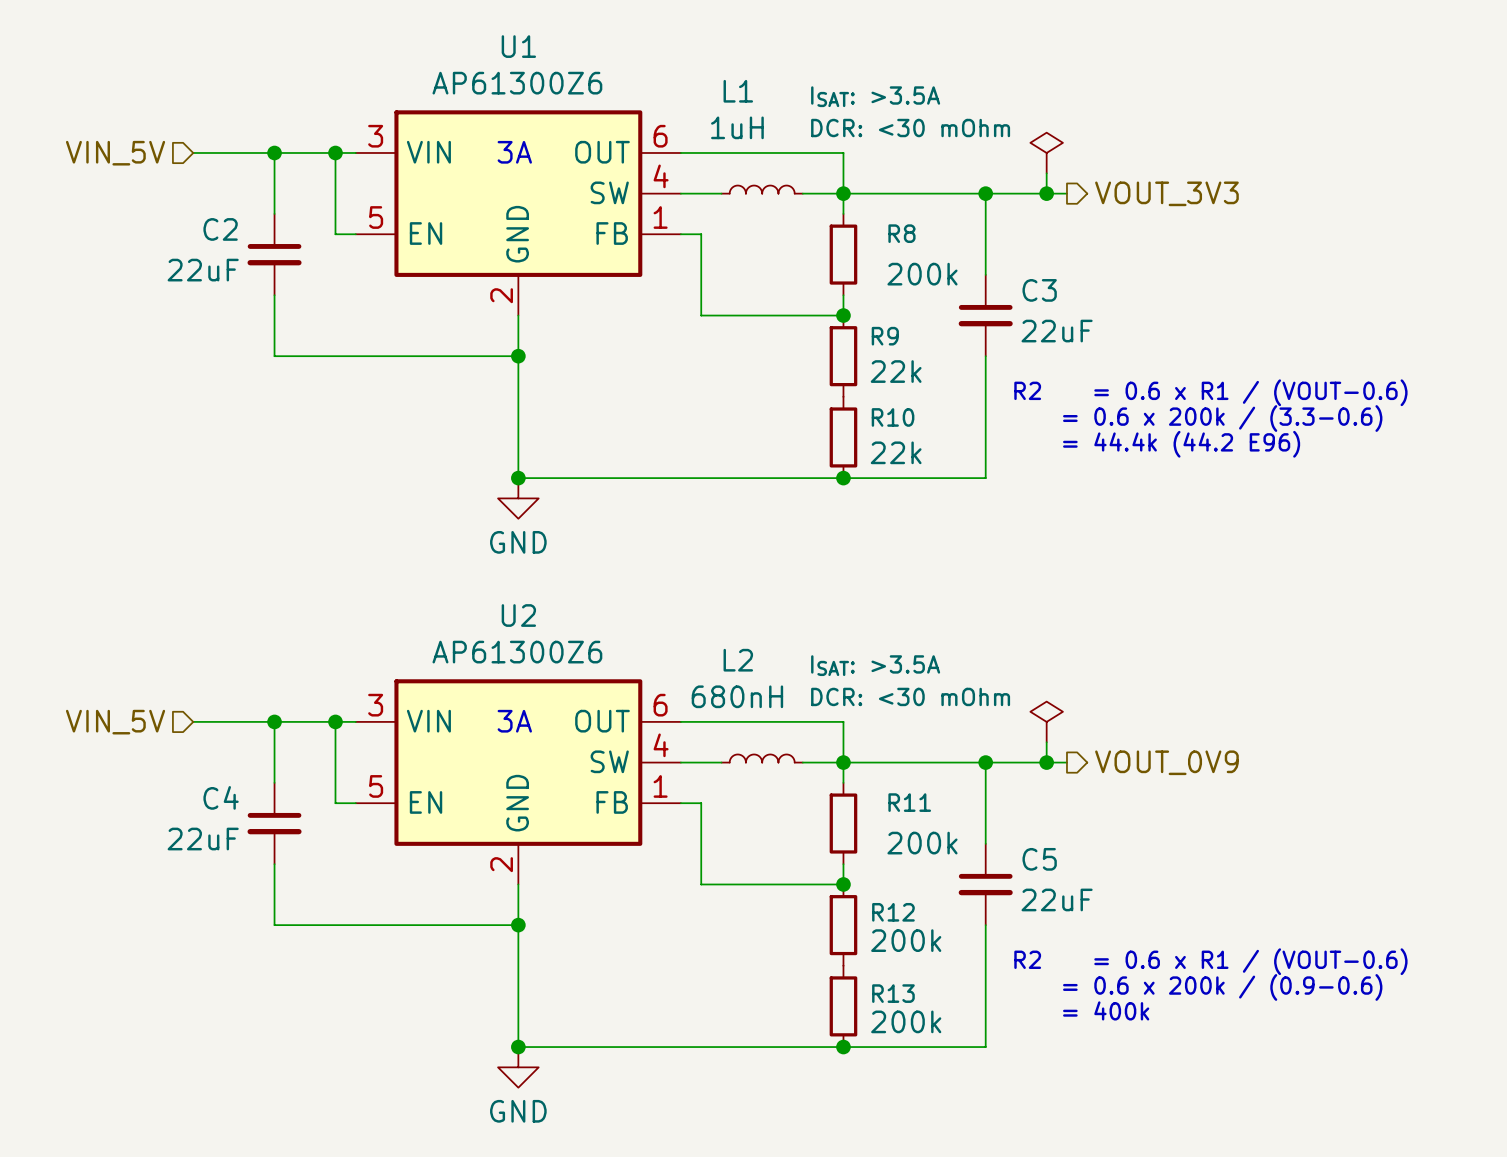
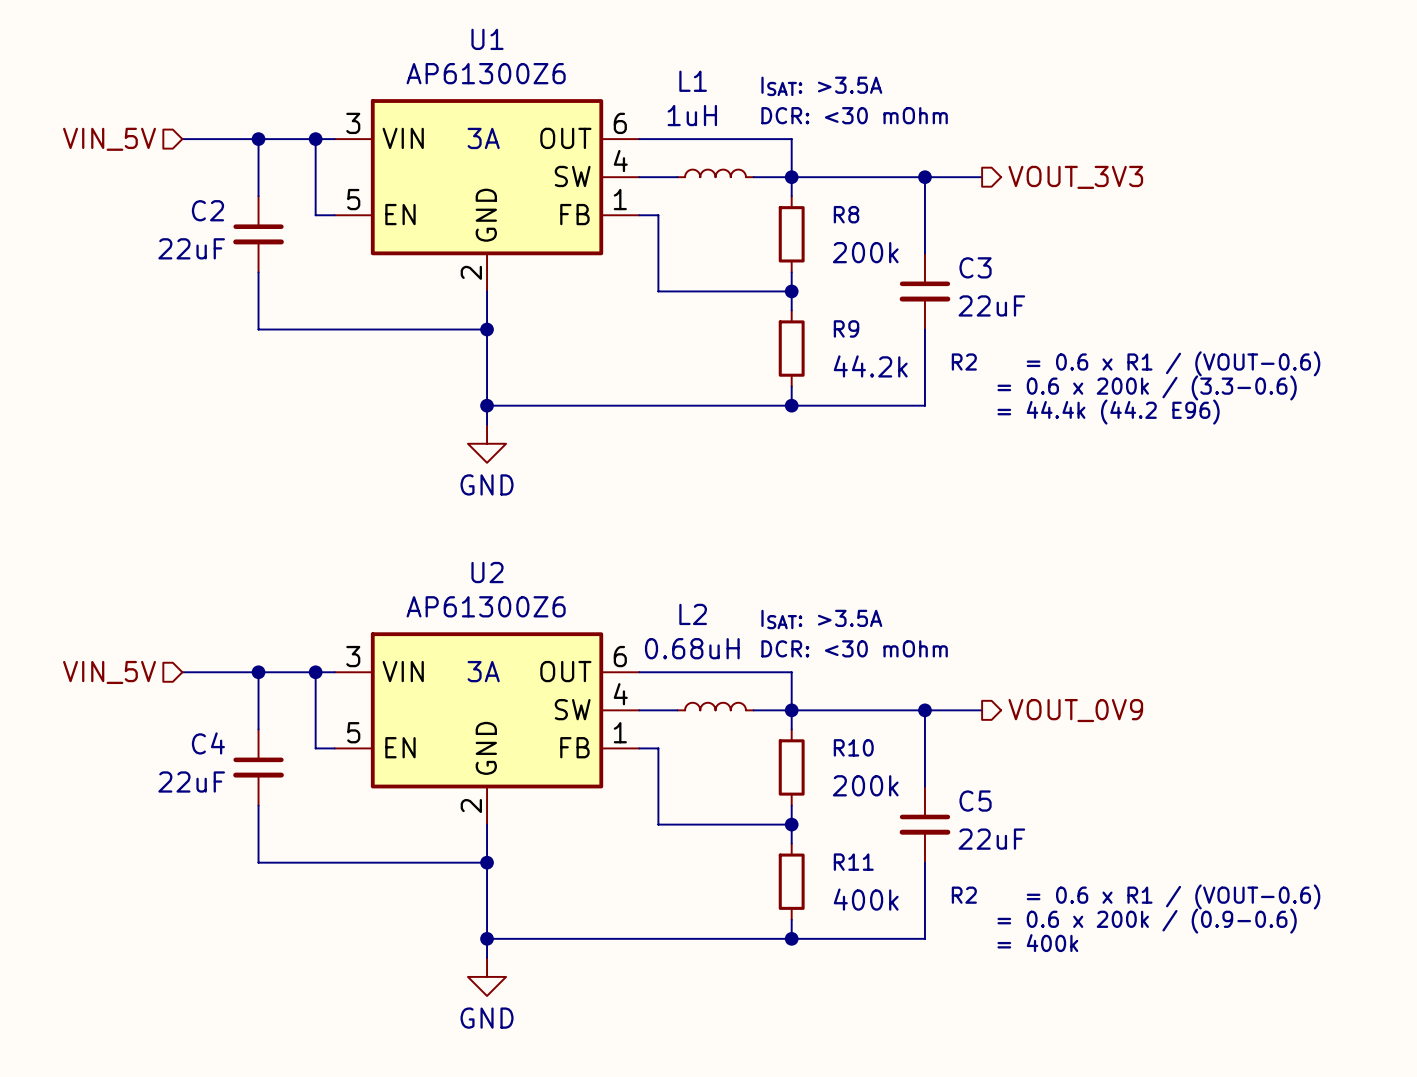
power symbol: (1046, 152) -> none
wire: (1046, 173) (1046, 193) (1066, 193) -> none
junction: (1046, 193) -> none
hierarchical label position: VOUT_3V3 (1166, 193) -> VOUT_3V3 (1075, 177)
R9 name position: R9 (885, 336) -> R9 (846, 328)
R9 position: (843, 356) -> (791, 348)
R9 value: 22k (896, 371) -> 44.2k (870, 366)
wire: none -> (791, 386) (791, 405)
R10: 22k (843, 437) -> none
wire: (985, 437) (985, 478) (518, 478) (518, 457) -> (924, 405) (487, 405)
junction position: (518, 478) -> (487, 405)
junction position: (843, 478) -> (791, 405)
power symbol position: GND (518, 498) -> GND (487, 443)
L2 value: 680nH (737, 696) -> 0.68uH (692, 648)
power symbol: (1046, 721) -> none
wire: (1046, 742) (1046, 762) (1066, 762) -> none
junction: (1046, 762) -> none
hierarchical label position: VOUT_0V9 (1166, 762) -> VOUT_0V9 (1075, 710)
R11 name: R11 (909, 802) -> R10 (853, 747)
R12: 200k (843, 925) -> none
R11: none -> 400k (791, 881)
wire: none -> (791, 919) (791, 938)
R13: 200k (843, 1006) -> none
wire: (985, 1006) (985, 1047) (518, 1047) (518, 1026) -> (924, 938) (487, 938)
junction position: (518, 1047) -> (487, 938)
junction position: (843, 1047) -> (791, 938)
power symbol position: GND (518, 1067) -> GND (487, 976)

